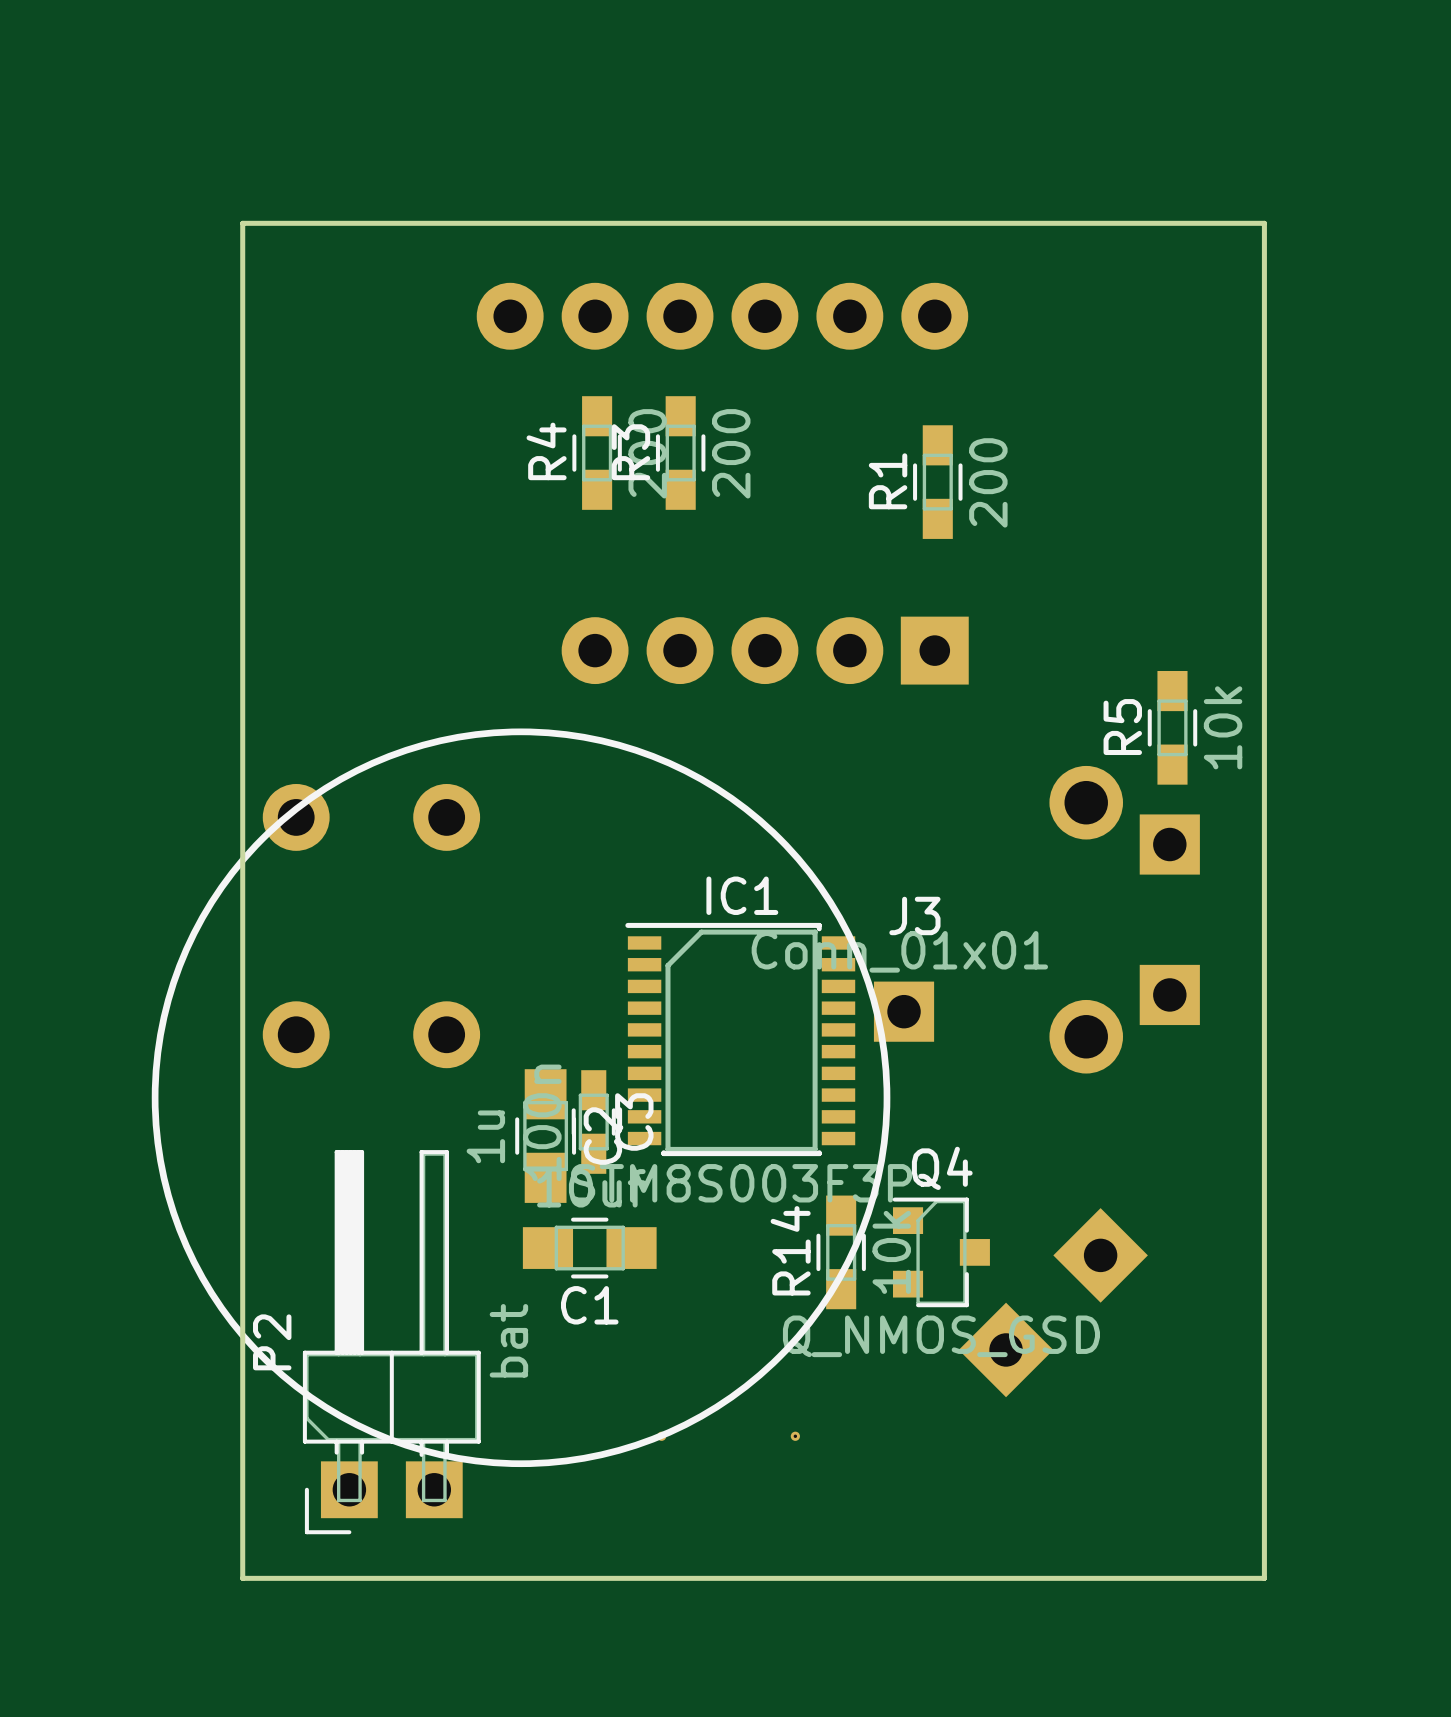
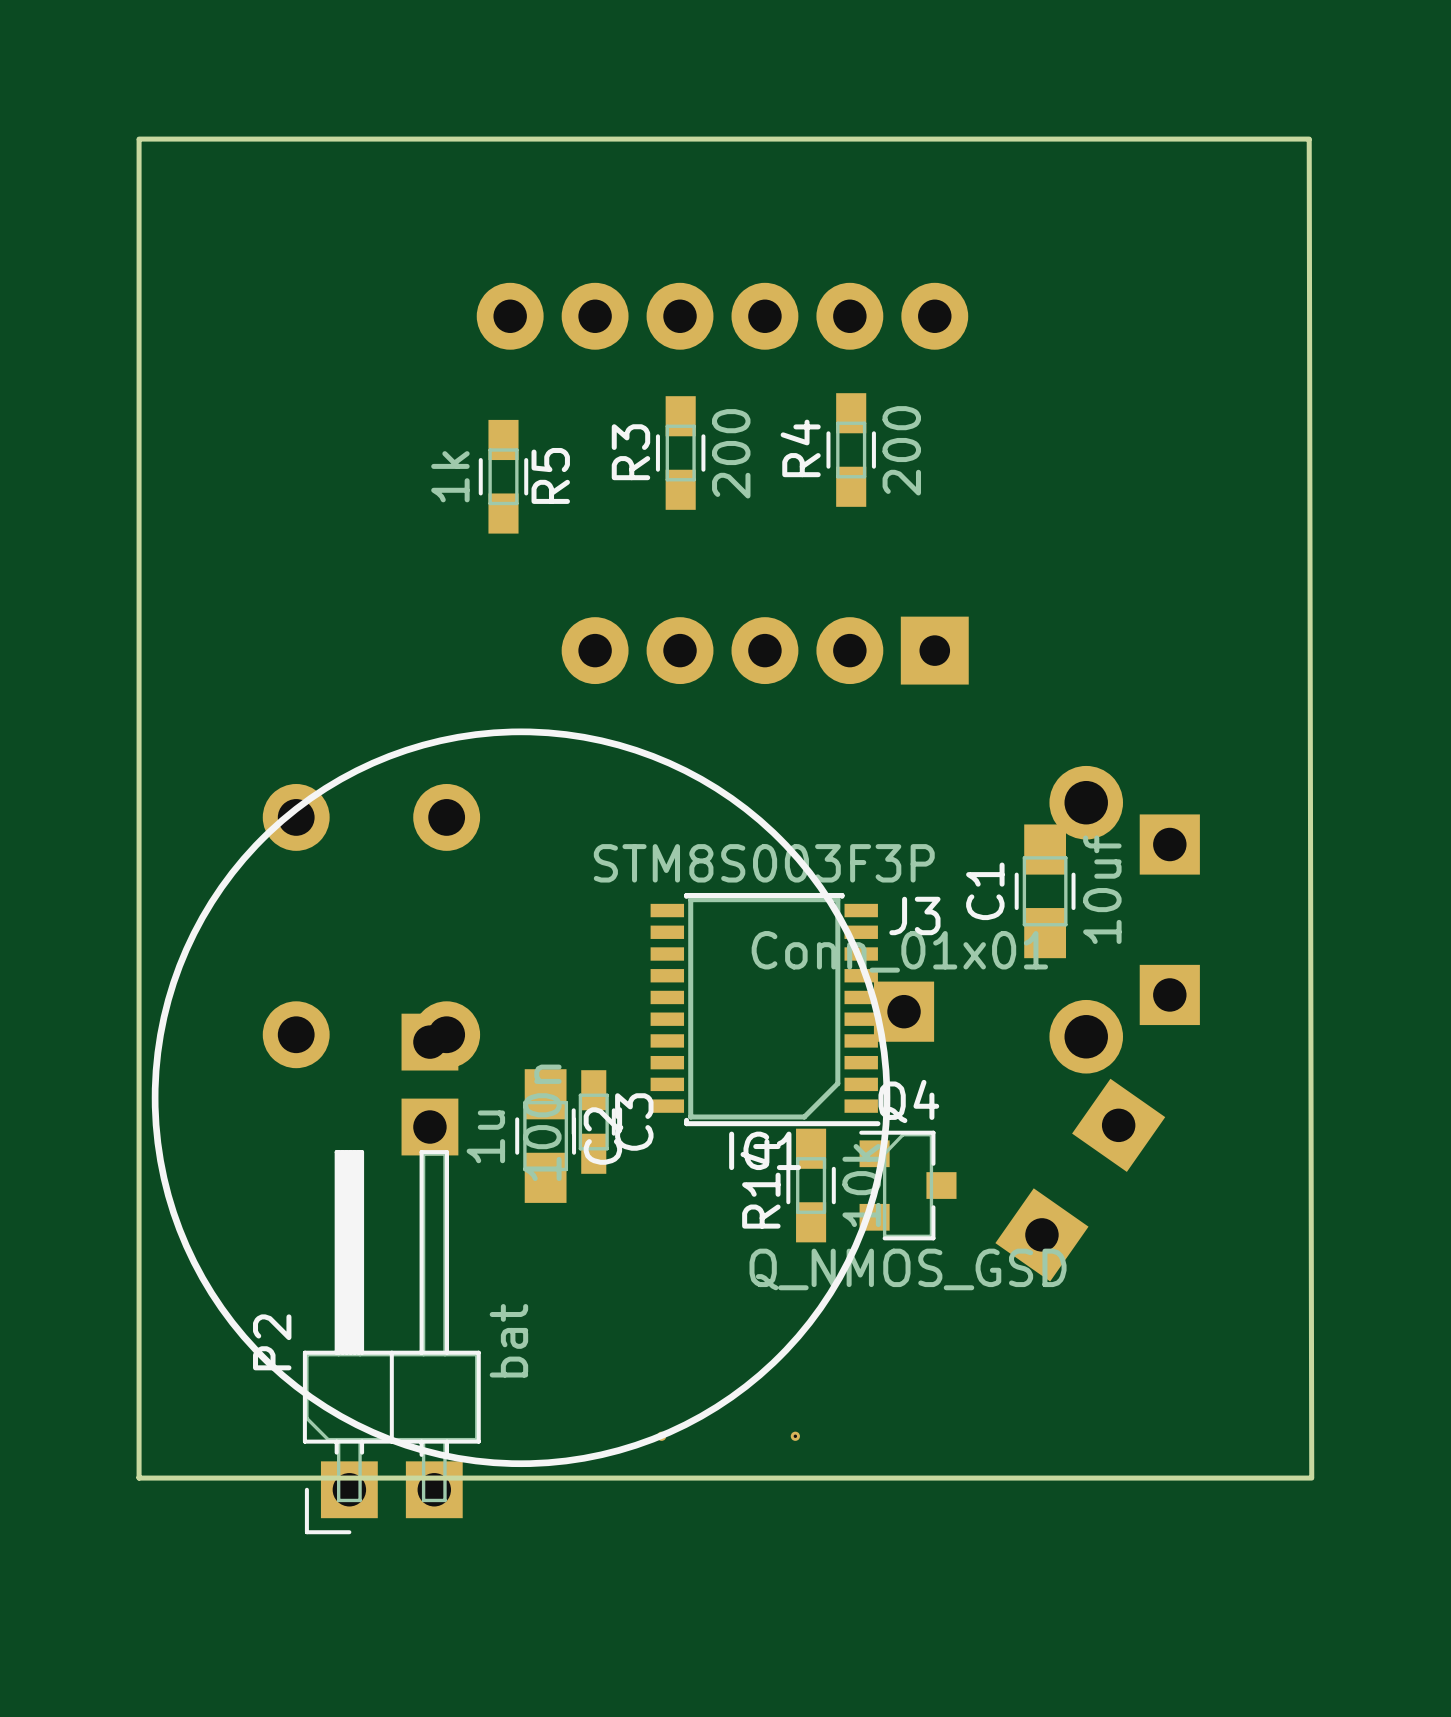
board edge: none -> (139, 139) (1309, 139)
board edge: none -> (139, 139) (139, 1478) (1311, 1478)
board edge: none -> (1309, 139) (1311, 1477)
board edge: (242, 223) (242, 1578) (1264, 1578) (1264, 223) (242, 223) -> none
R4 position: (597, 453) -> (851, 450)
R1: 200 (937, 482) -> none
R5 name position: R5 (1122, 727) -> R5 (550, 475)
R5 position: (1172, 727) -> (503, 476)
R5 value: 10k (1223, 727) -> 1k (450, 476)
IC1 rotation: 0° (740, 1039) -> 180° (765, 1009)
part: none -> (429, 1084)
part: none -> (1080, 1180)
C1 rotation: 0° (589, 1248) -> 90° clockwise (1045, 891)
C1 position: (589, 1248) -> (1045, 891)
R14 position: (841, 1252) -> (811, 1185)
Q4 position: (941, 1252) -> (907, 1185)
part: (1053, 1302) -> none

